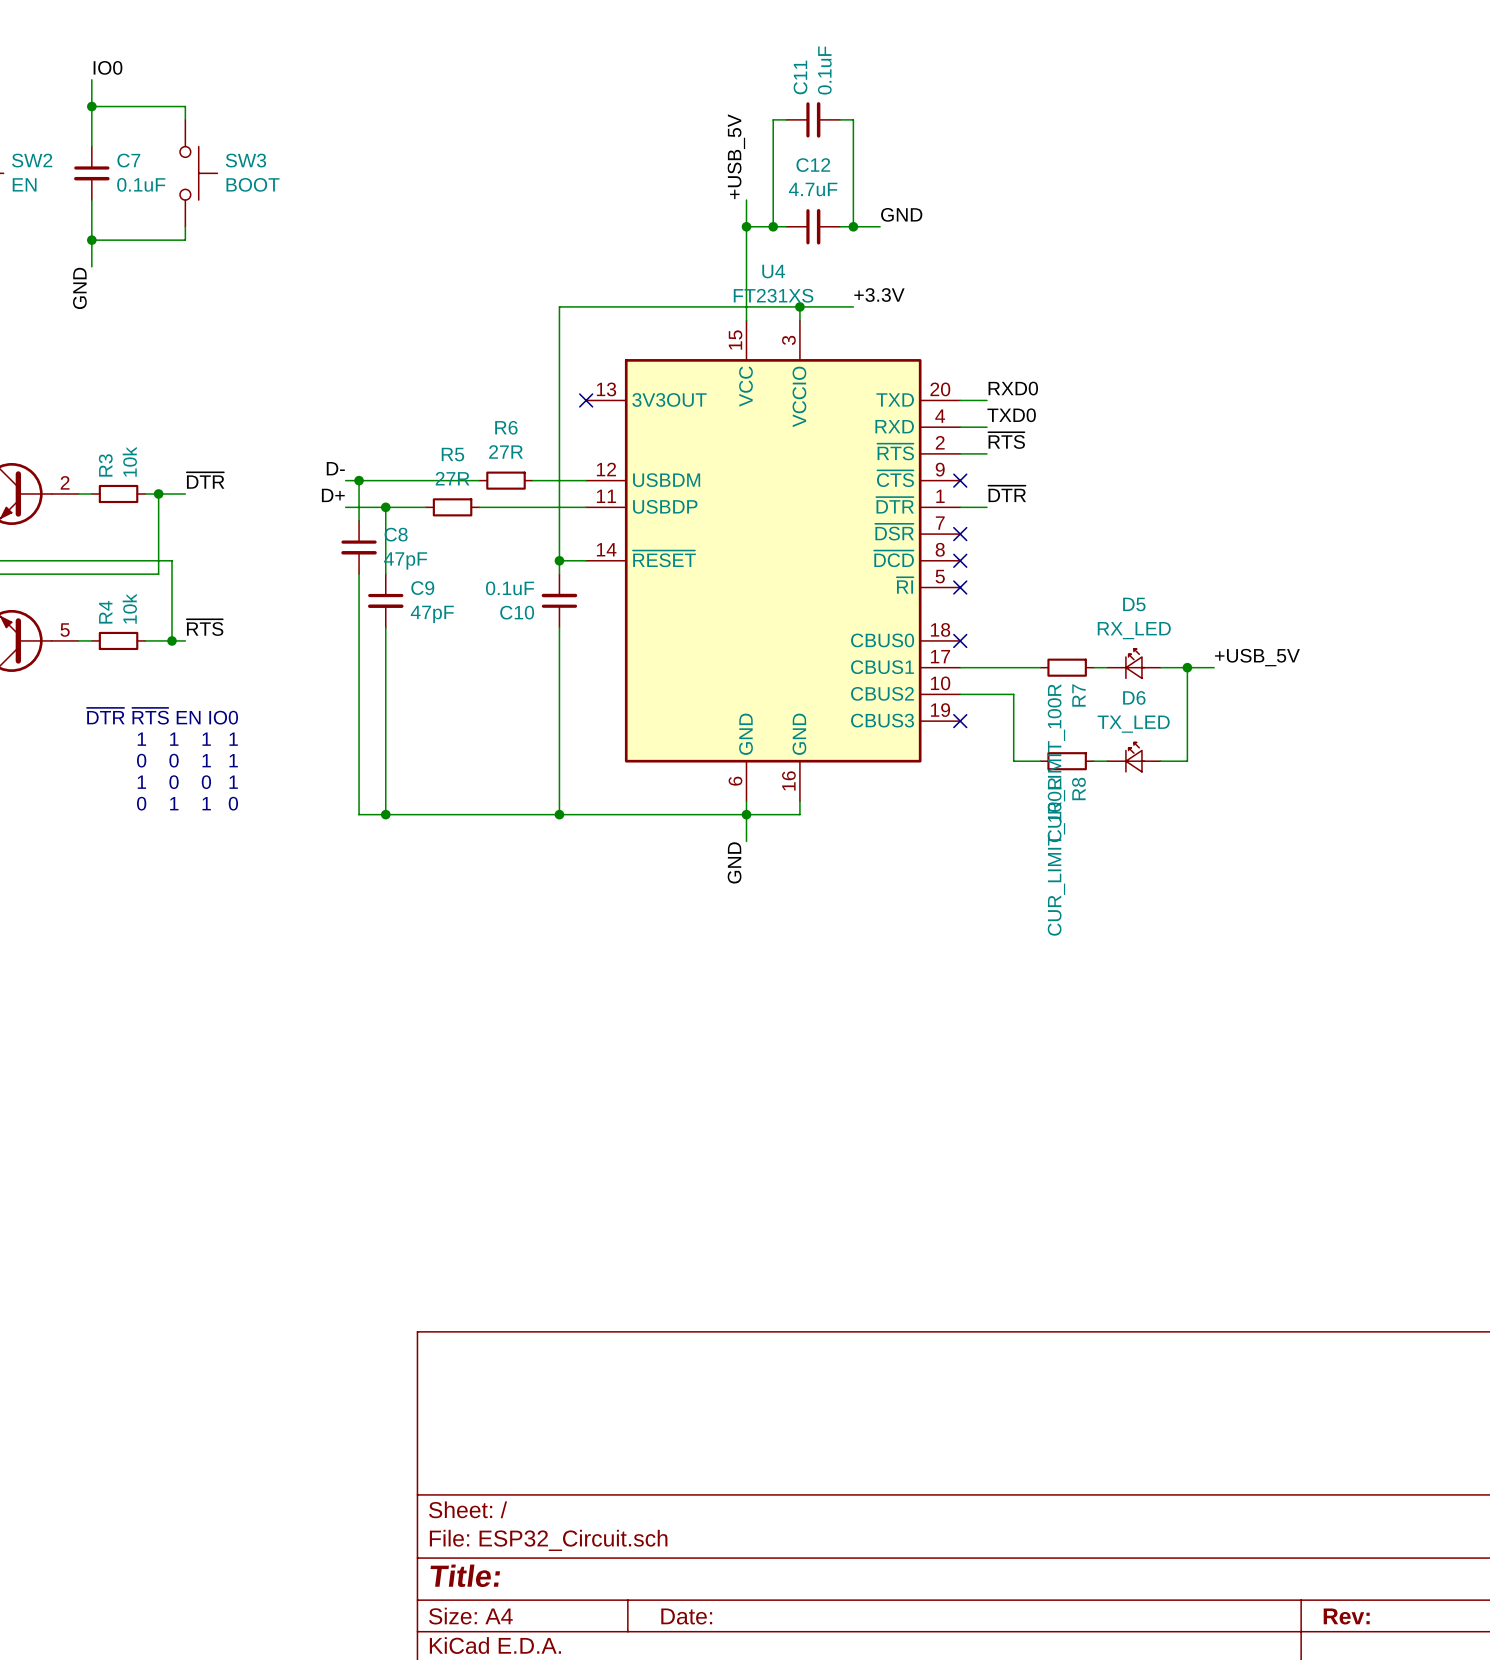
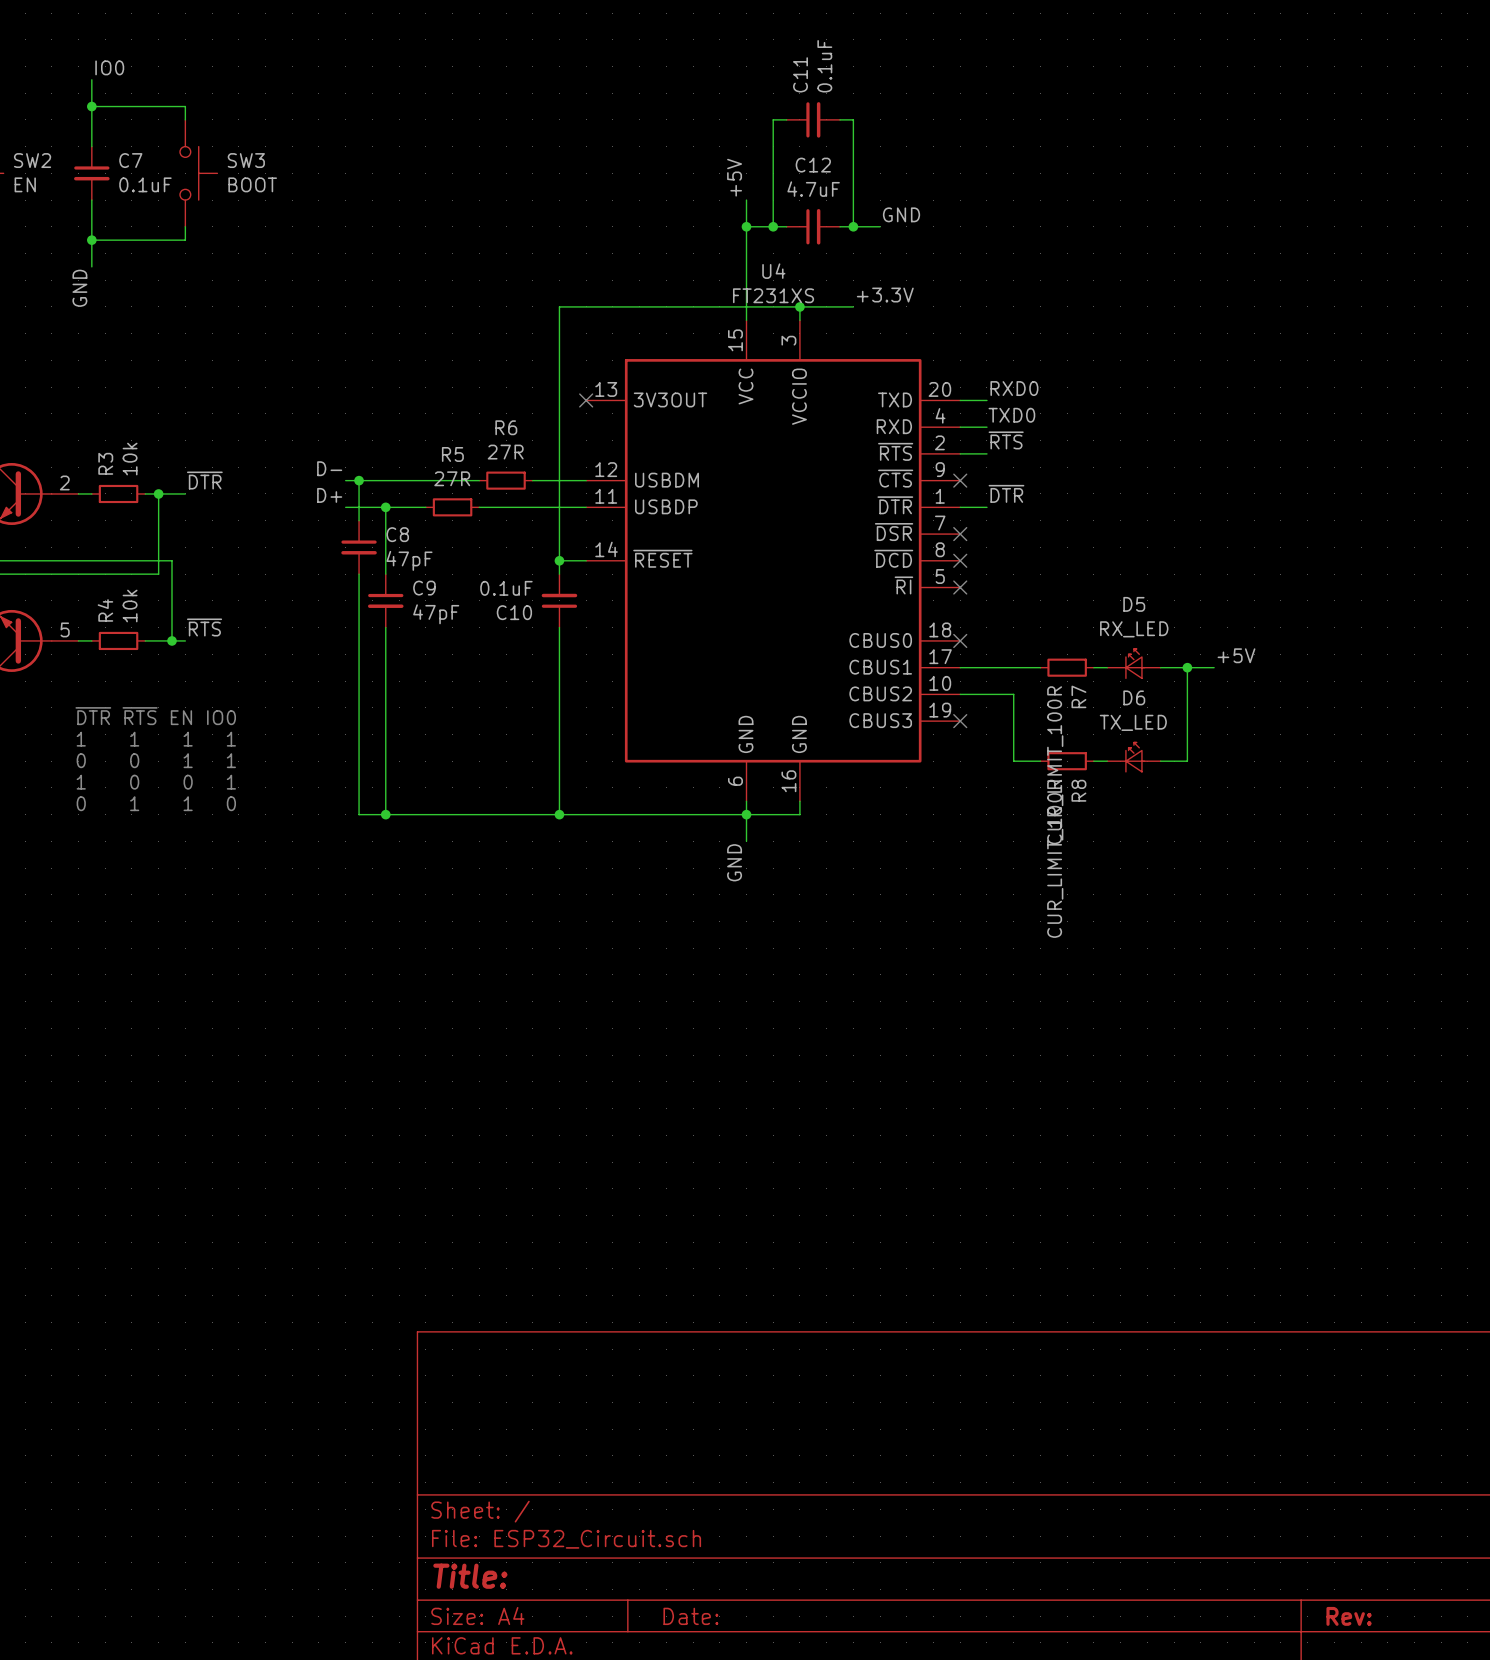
label: +USB_5V (736, 156) -> +5V (734, 177)
label: +USB_5V (1257, 657) -> +5V (1236, 655)

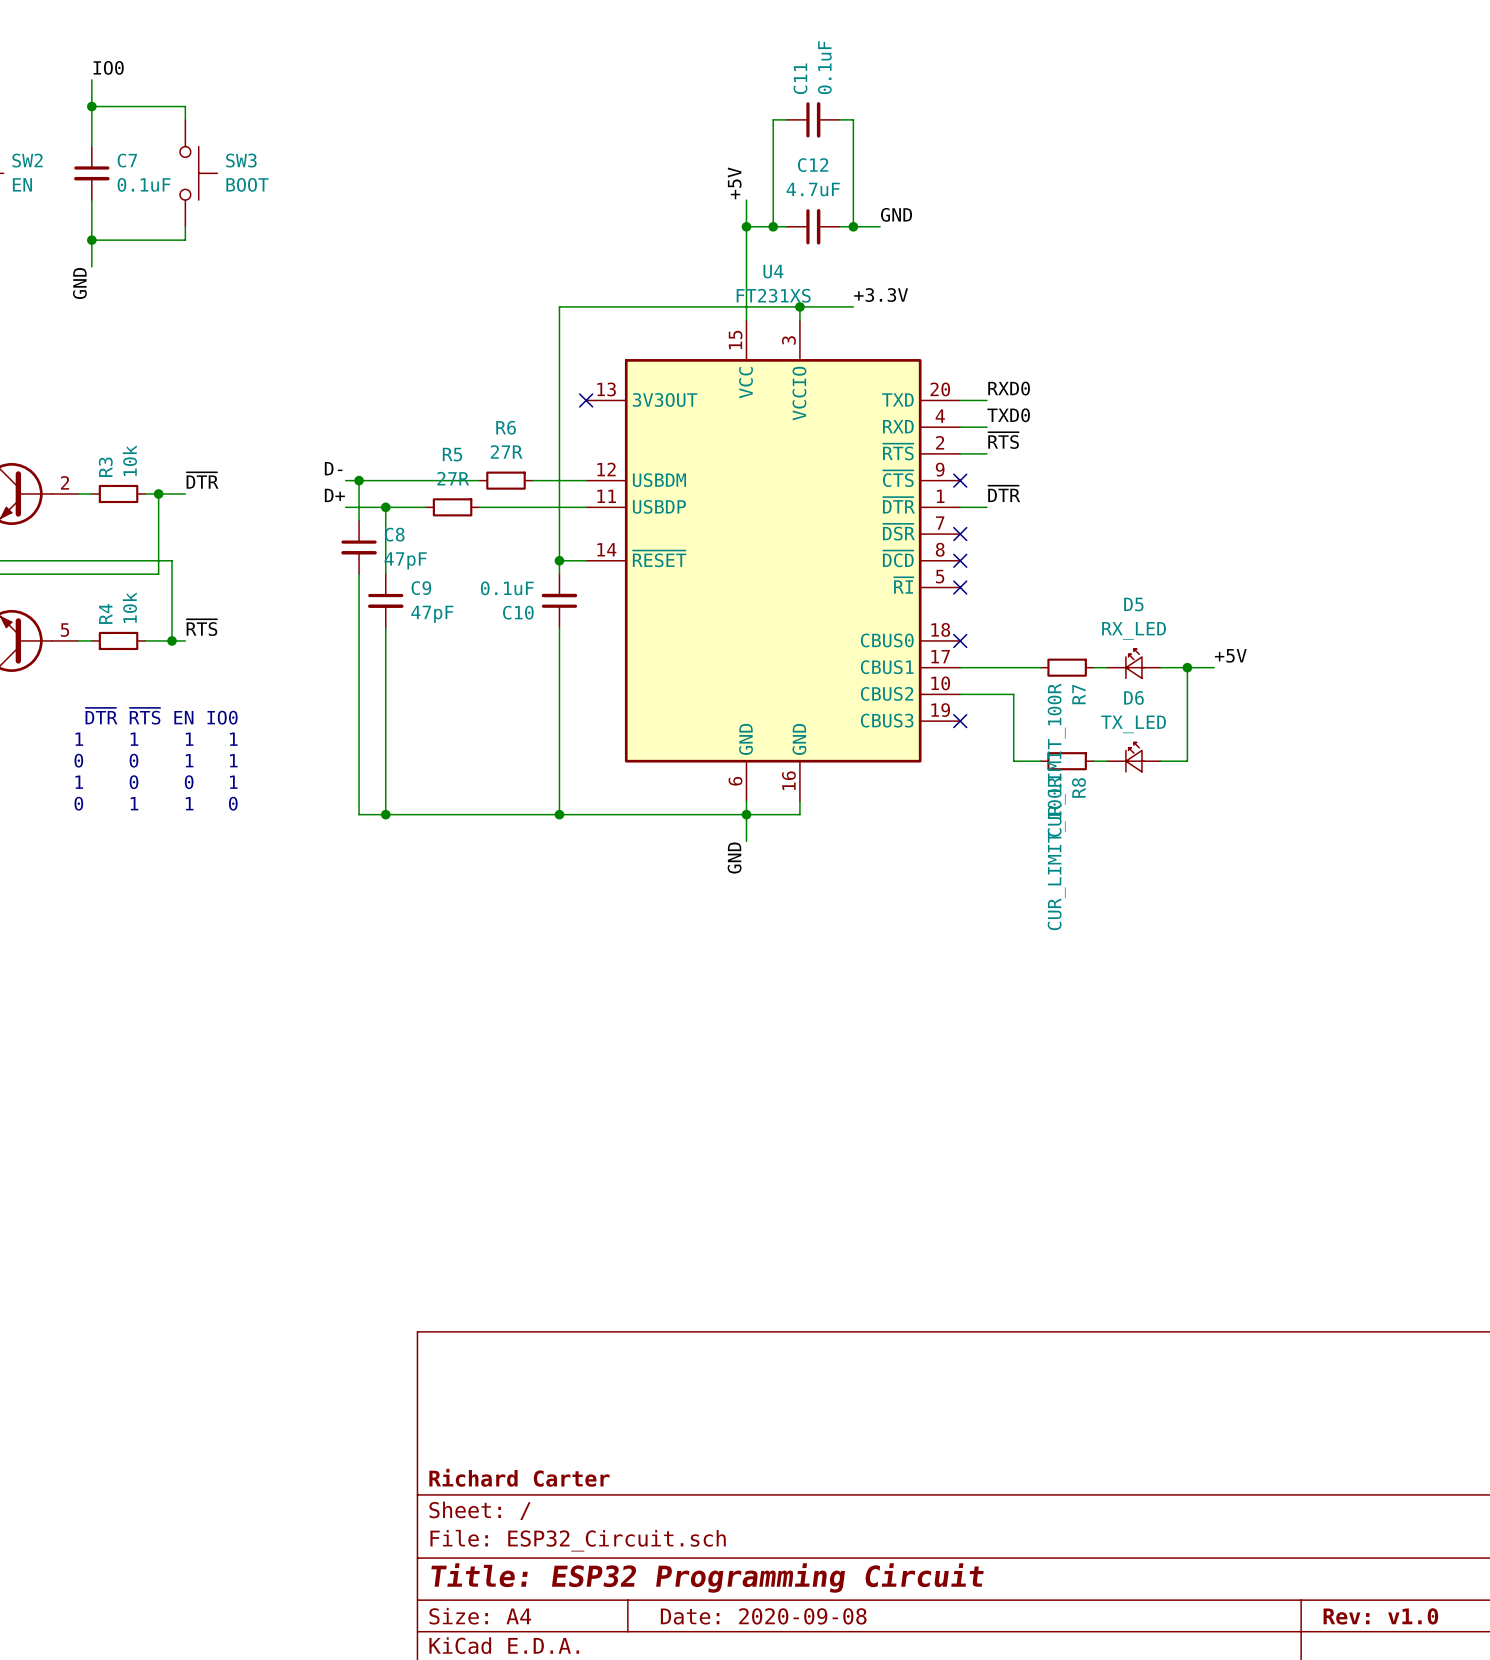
title block: none -> Richard Carter (519, 1477)
title block: Title: (470, 1576) -> Title: ESP32 Programming Circuit (707, 1577)
title block: Date: (690, 1616) -> Date: 2020-09-08 (763, 1616)
title block: Rev: (1349, 1616) -> Rev: v1.0 (1380, 1616)

